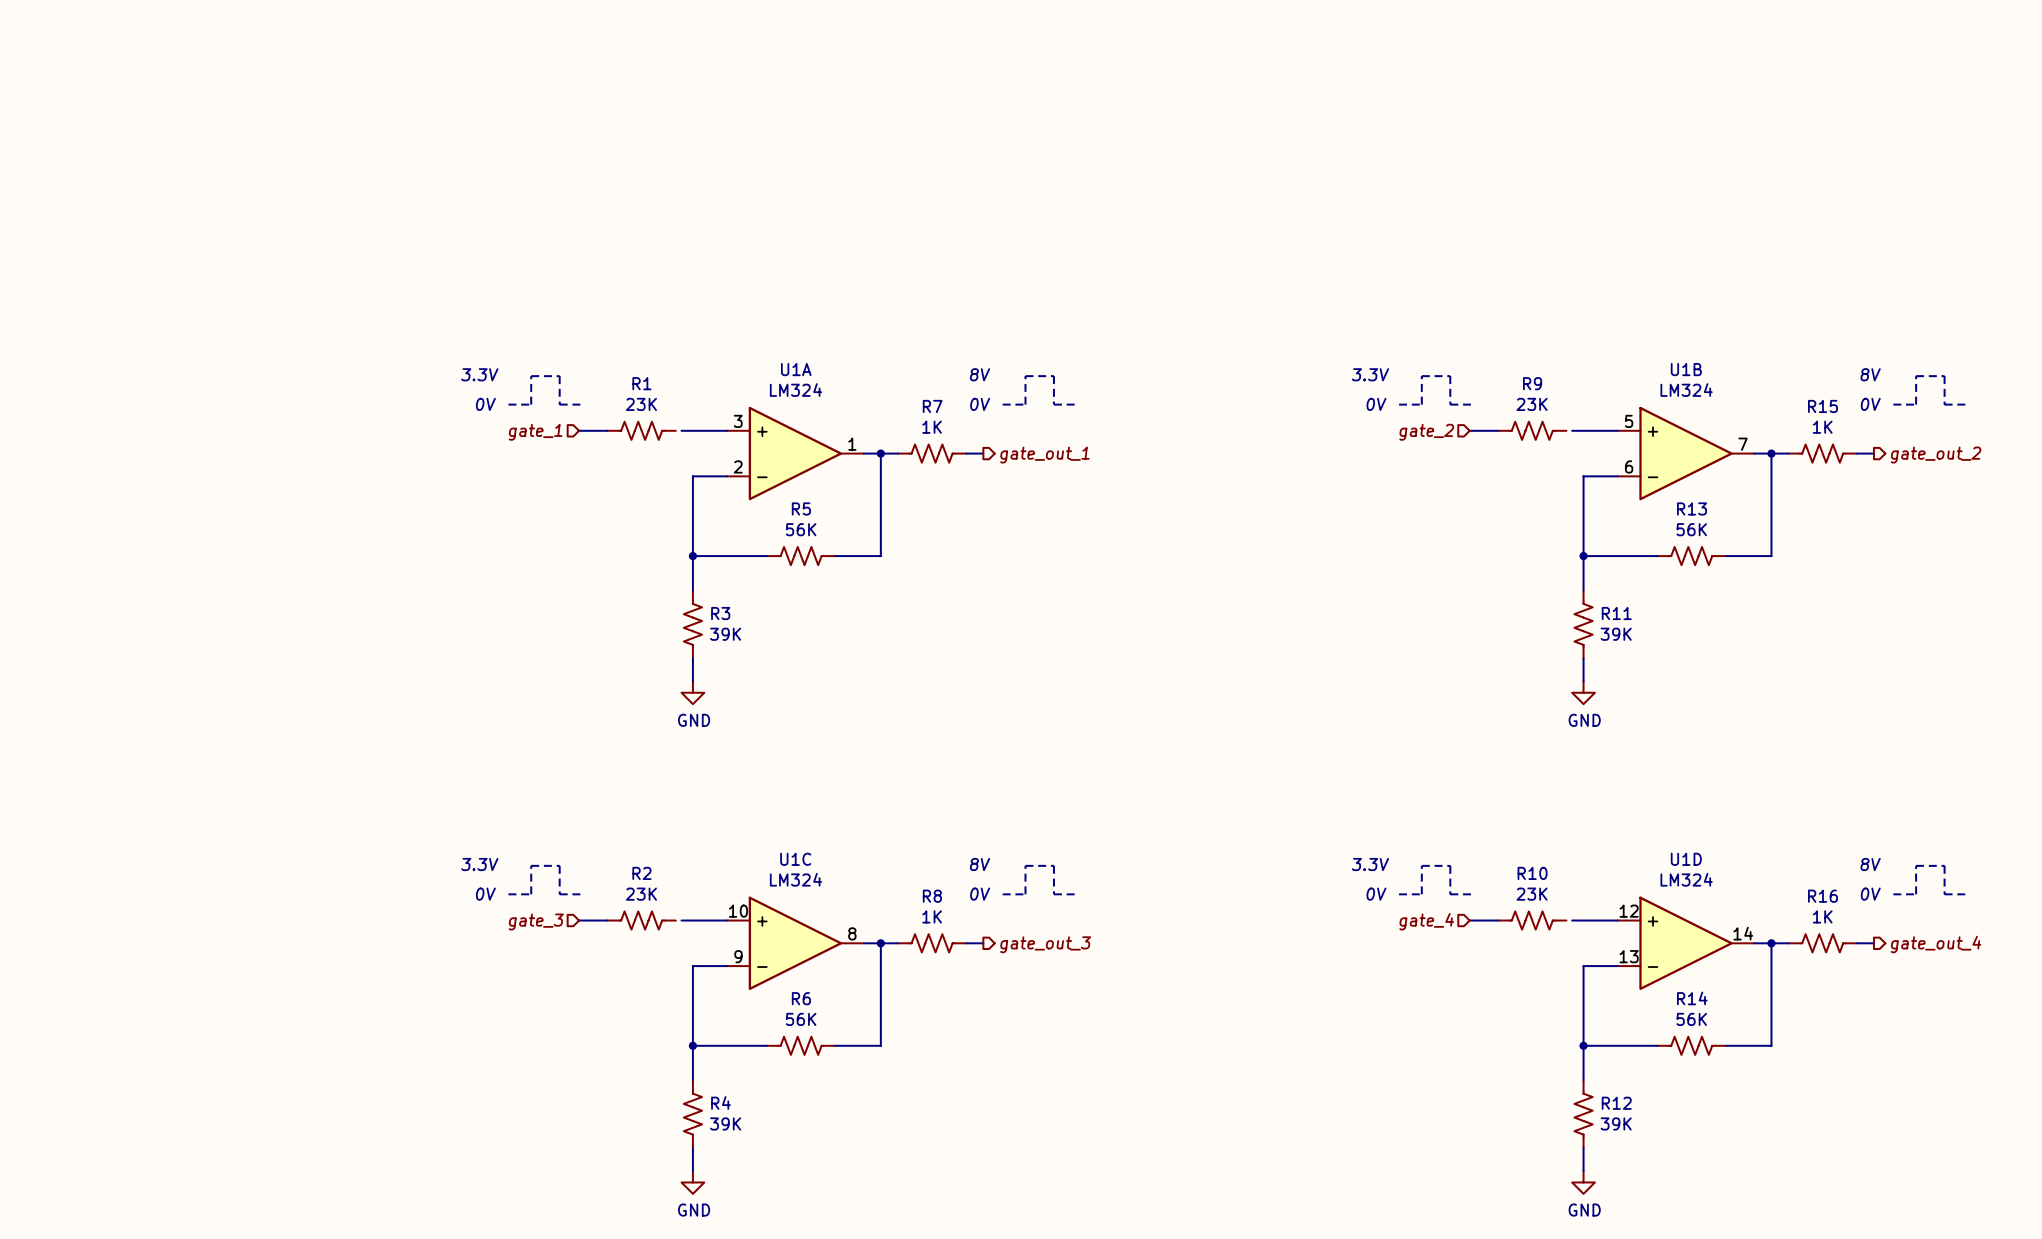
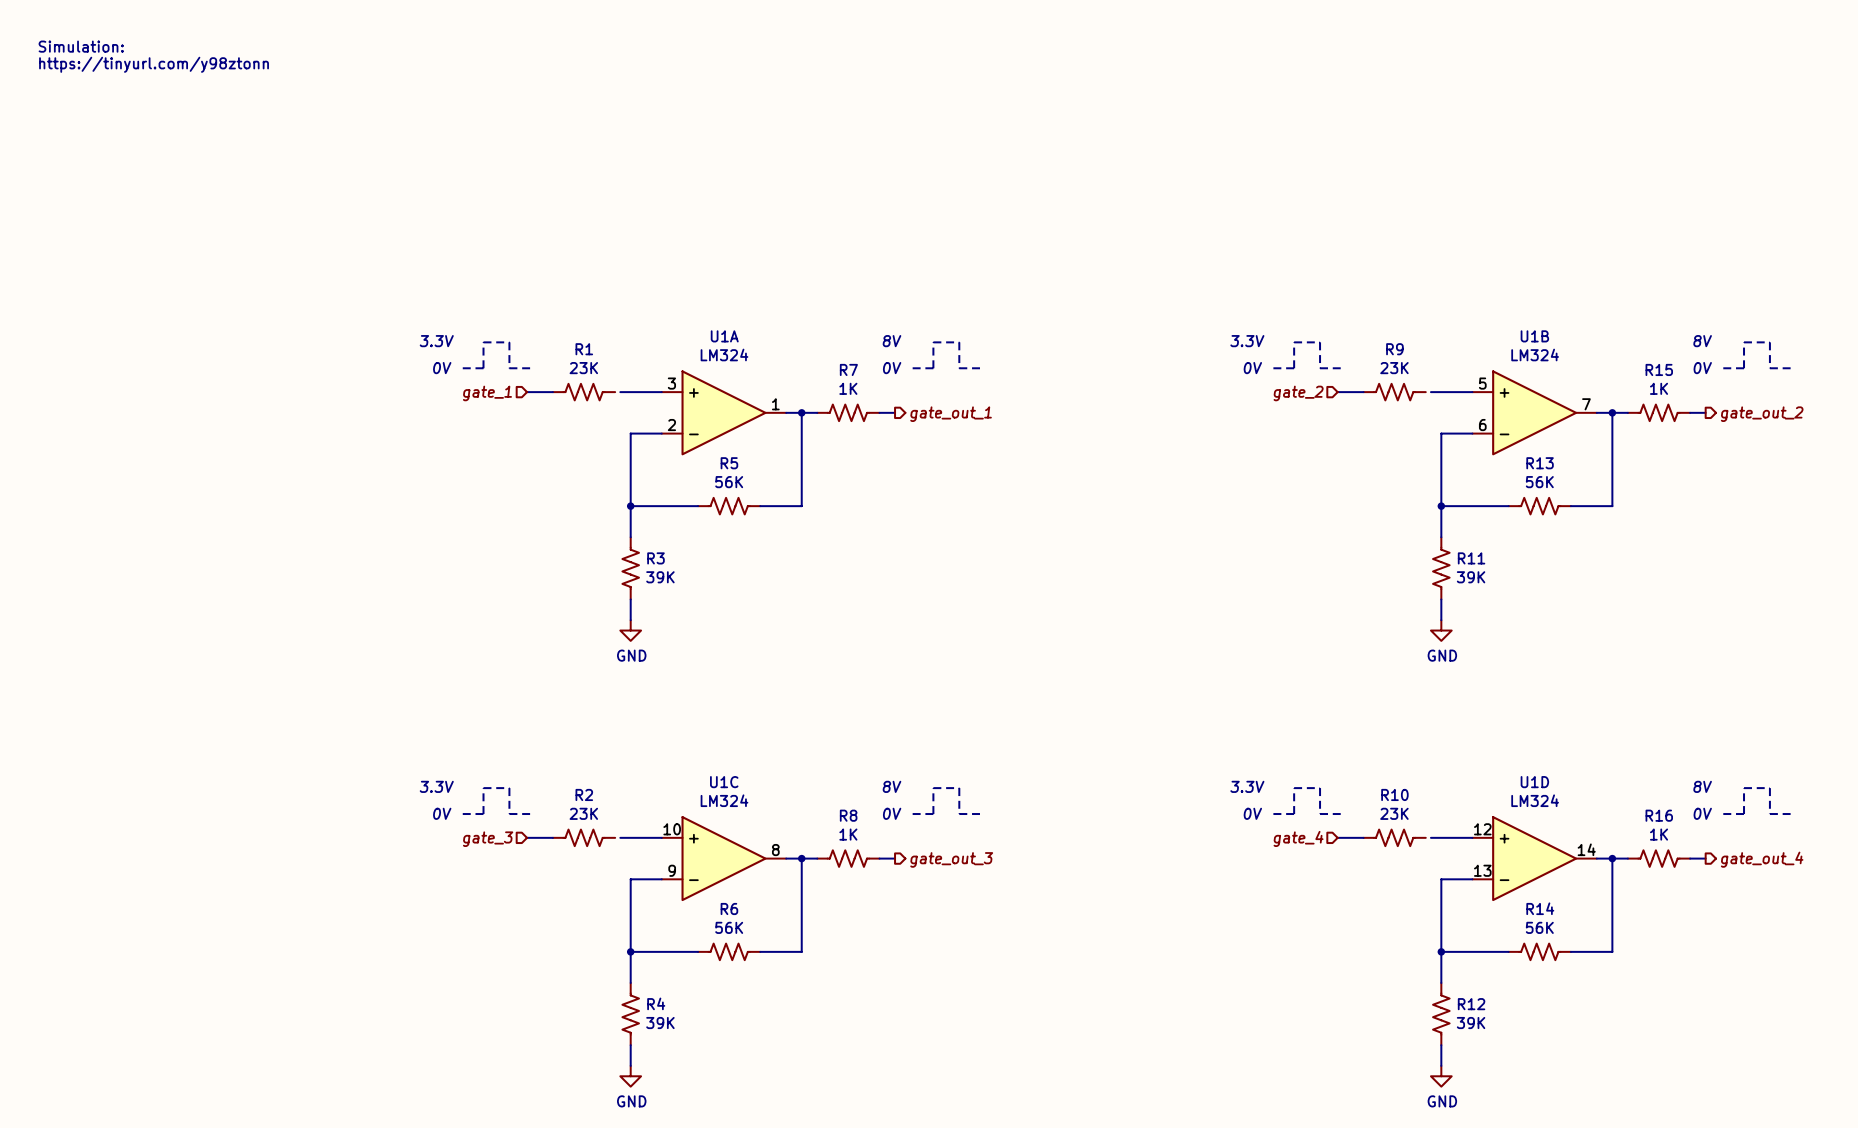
text: none -> Simulation: (81, 46)
text: none -> https://tinyurl.com/y98ztonn (154, 64)

